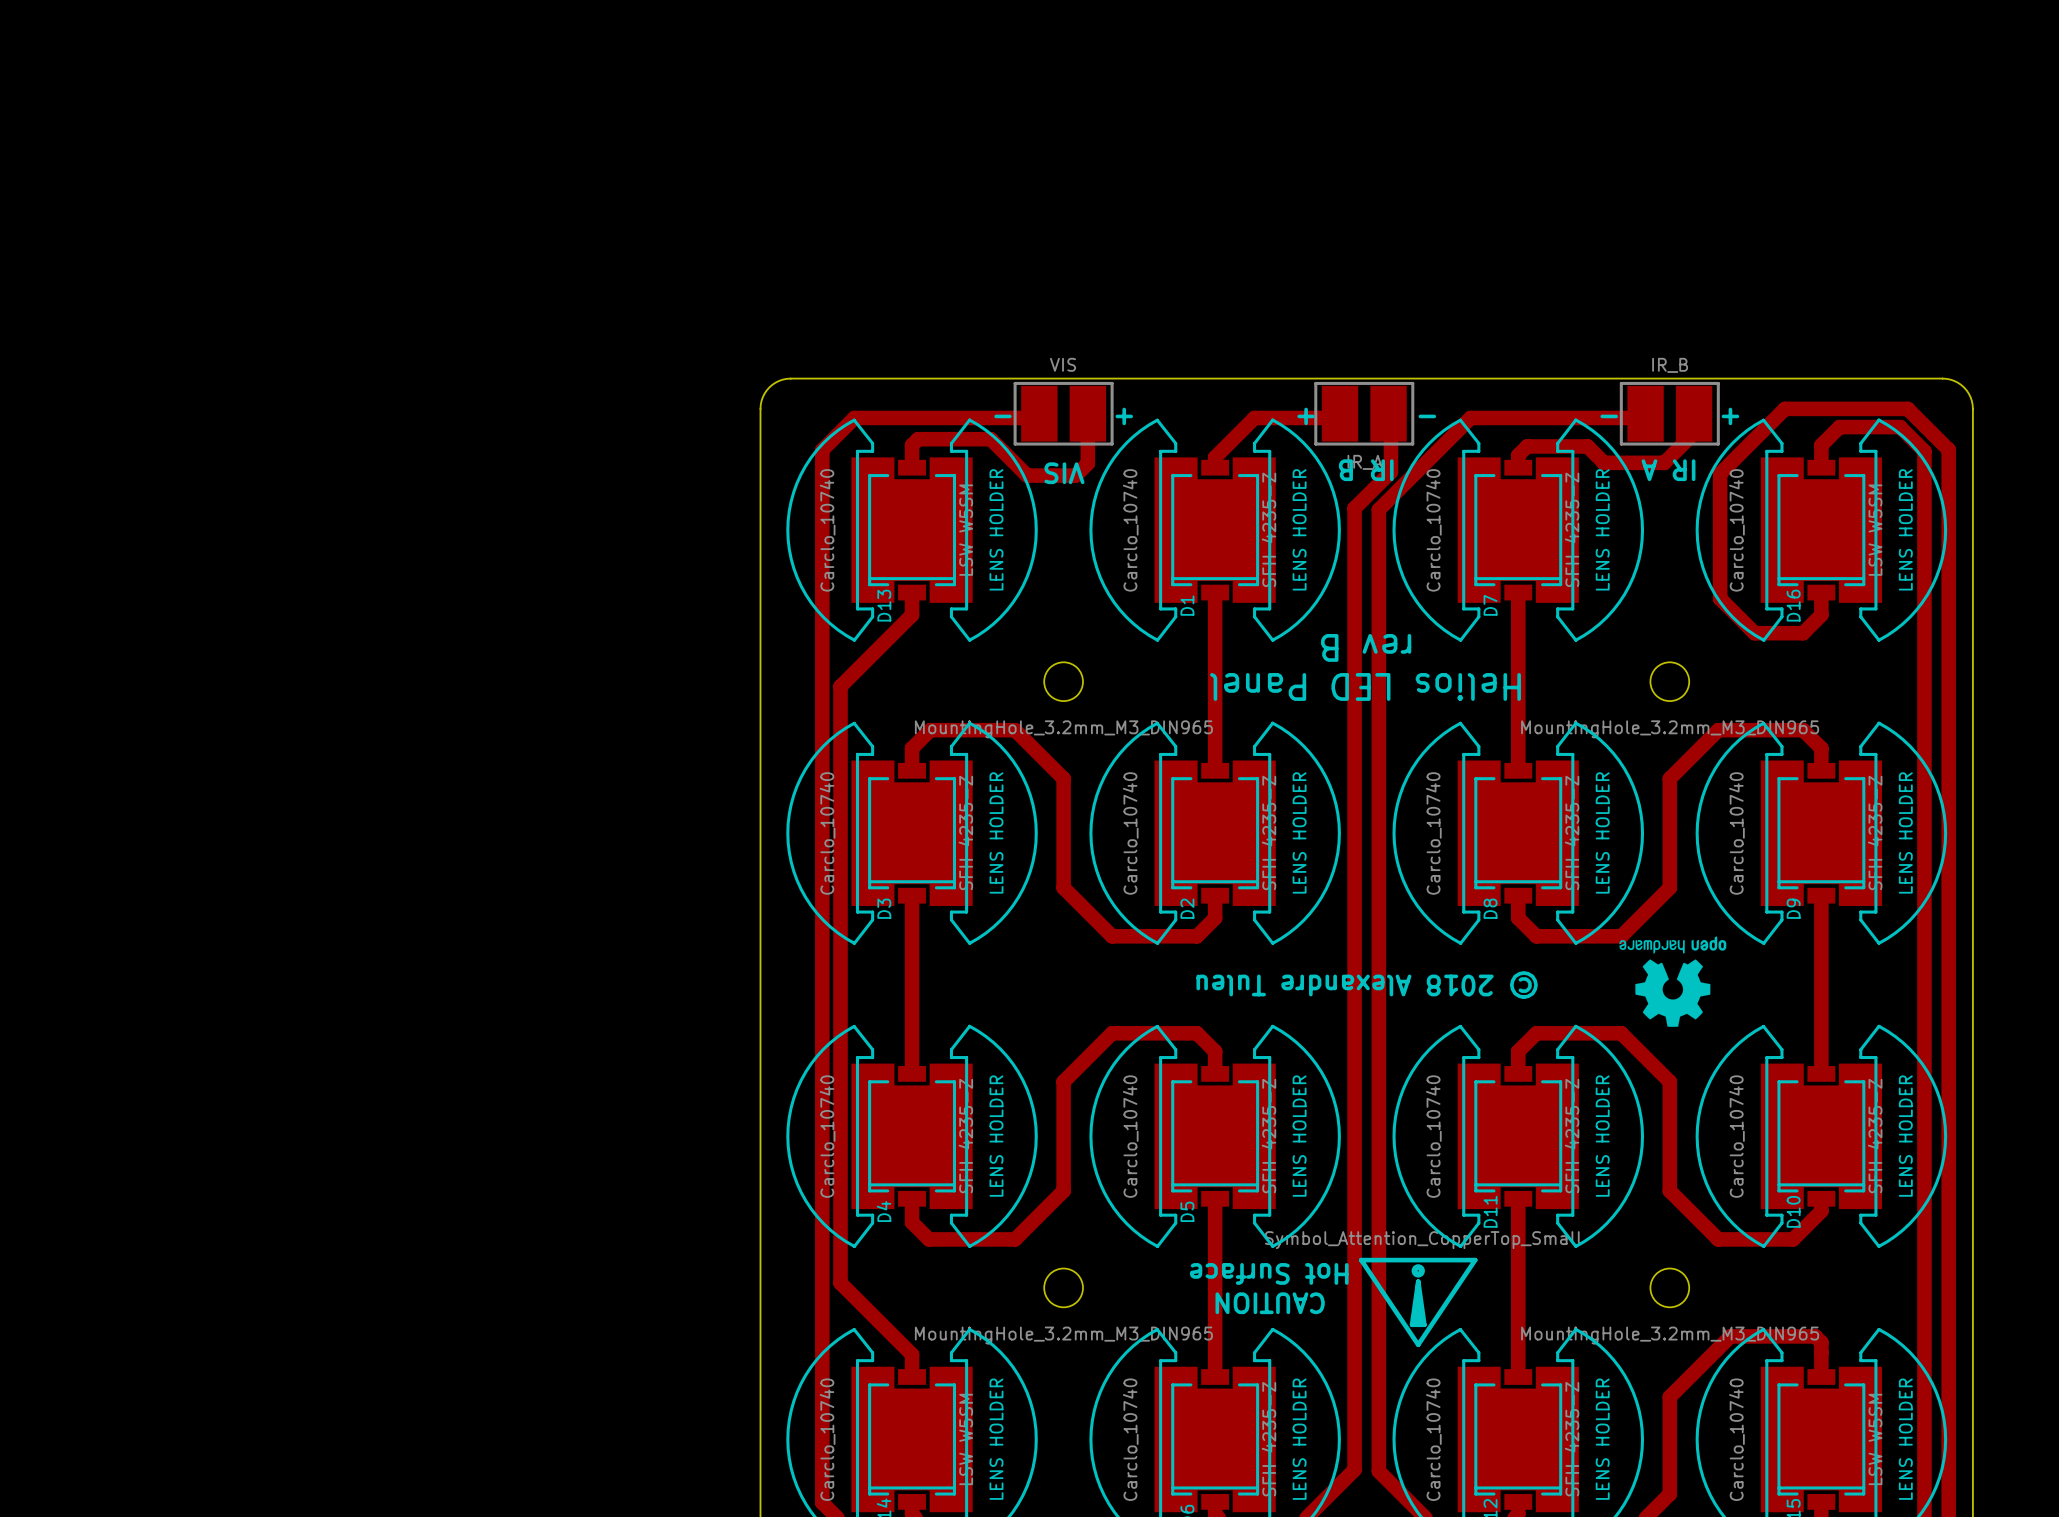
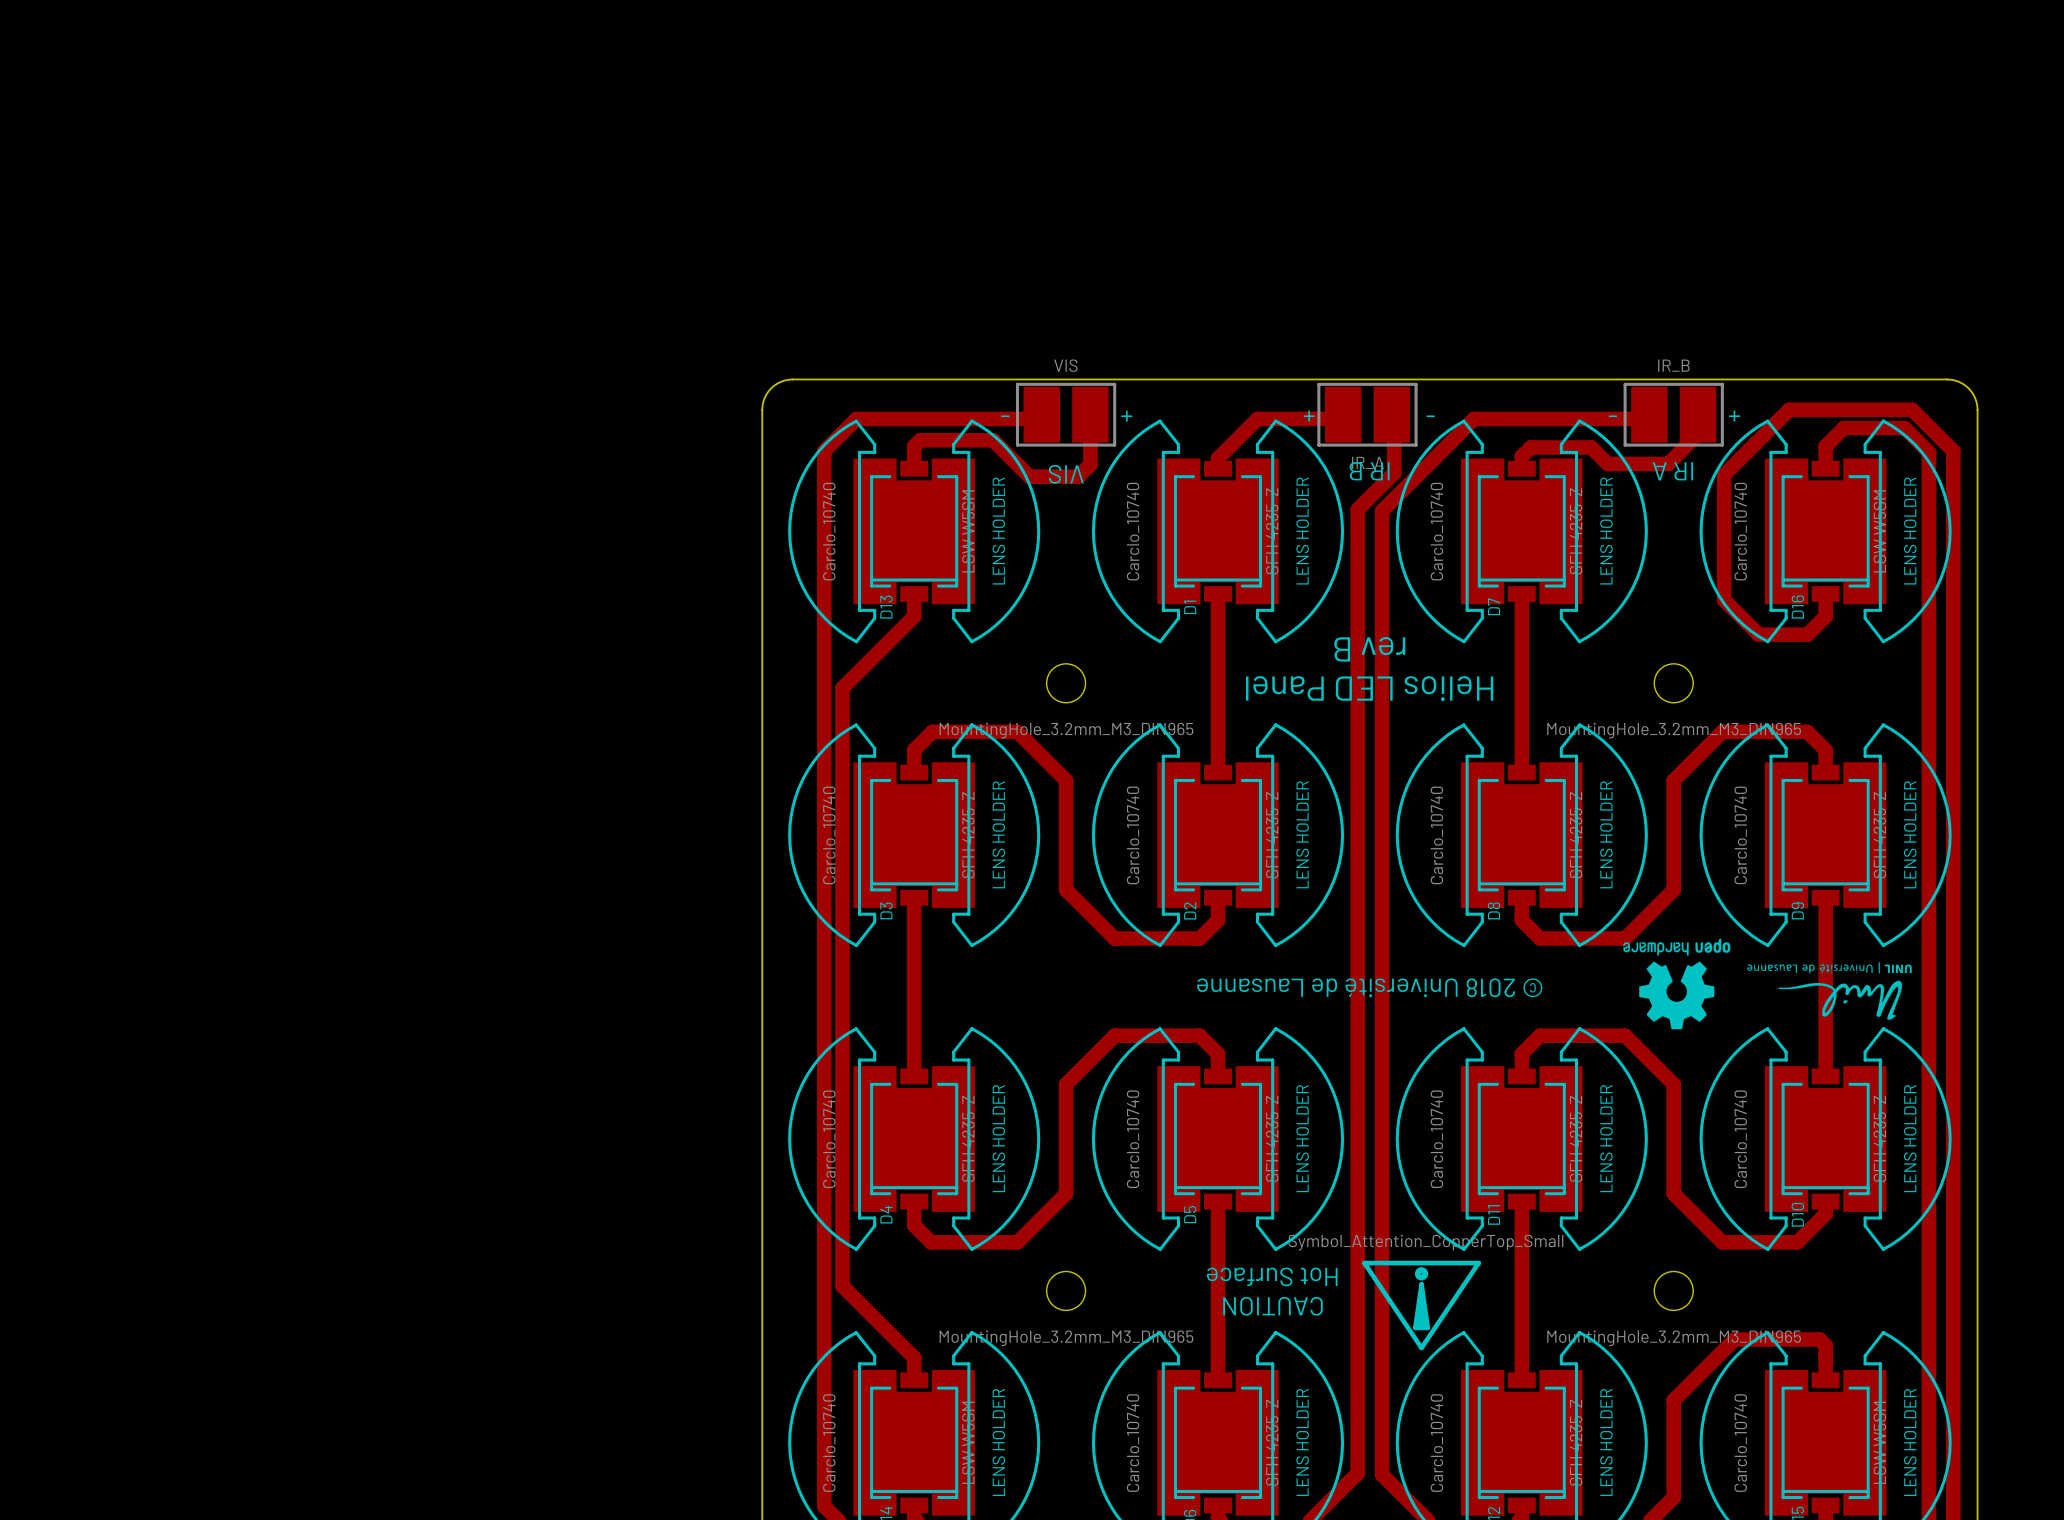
drawing: none -> [1747, 961, 1912, 1020]
text: © 2018 Alexandre Tuleu (1367, 985) -> © 2018 Université de Lausanne (1369, 987)

